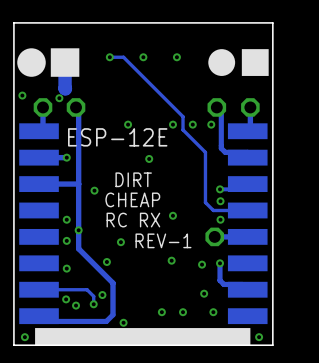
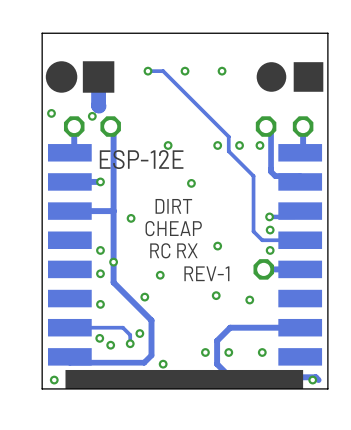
track: (220, 263) (220, 280) (223, 284) (242, 284) (247, 289) -> (318, 380) (315, 377) (230, 377) (217, 364) (217, 340) (230, 327) (300, 327)
via: (220, 263) -> none
via: (204, 293) -> none

